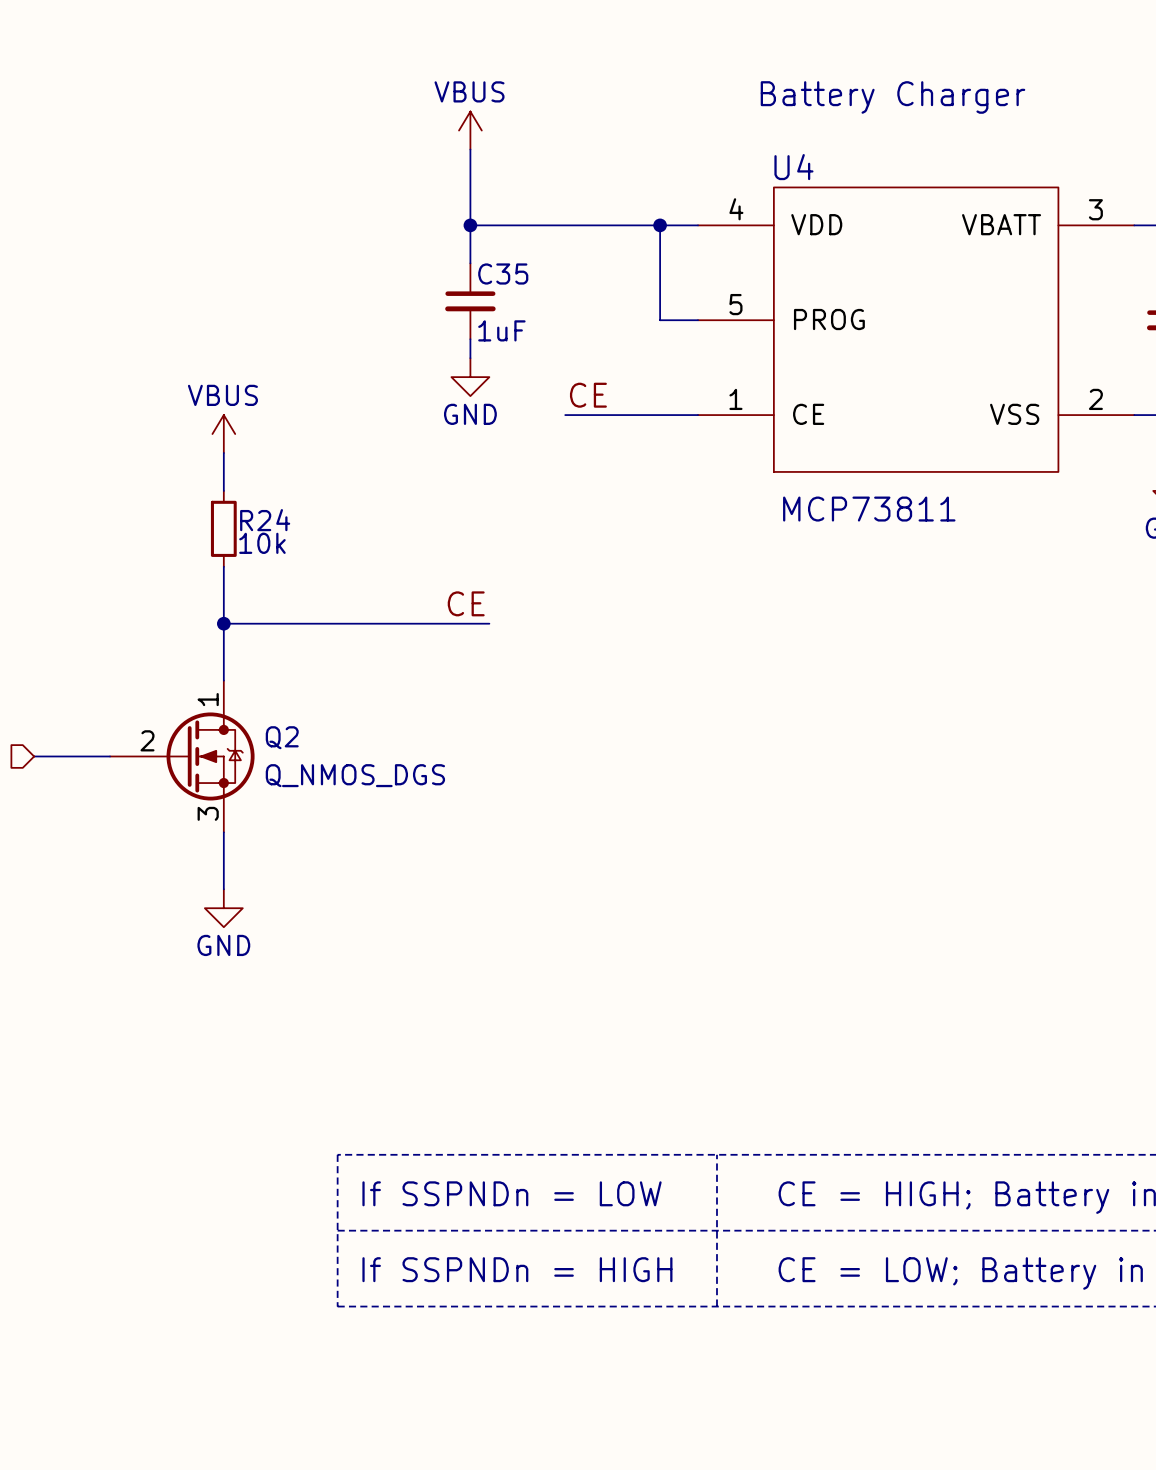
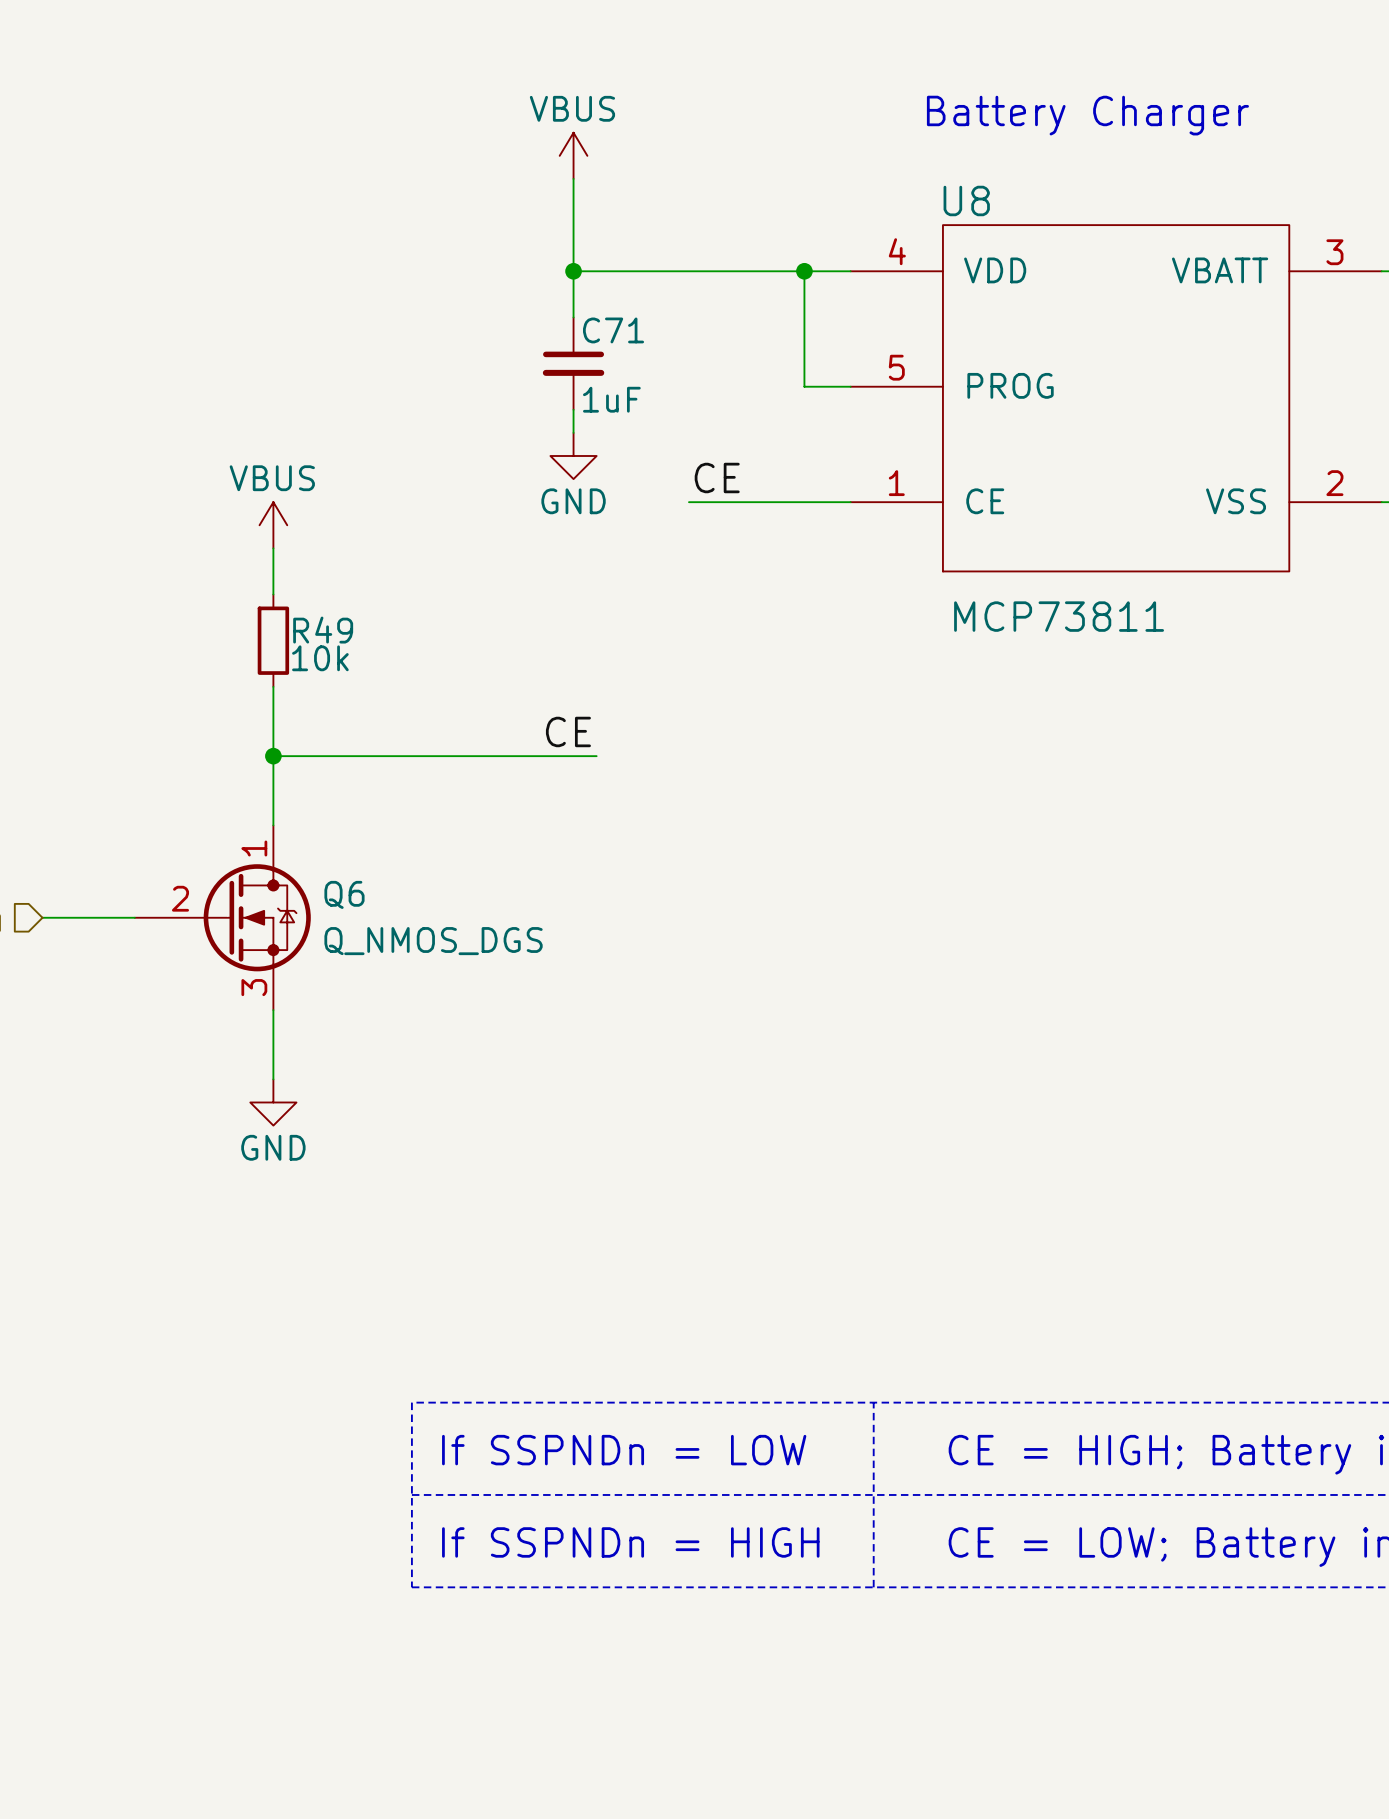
U4 name: U4 (793, 167) -> U8 (966, 200)
C35 name: C35 (503, 273) -> C71 (613, 330)
R24 name: R24 (265, 520) -> R49 (323, 630)
Q2 name: Q2 (282, 737) -> Q6 (344, 894)

